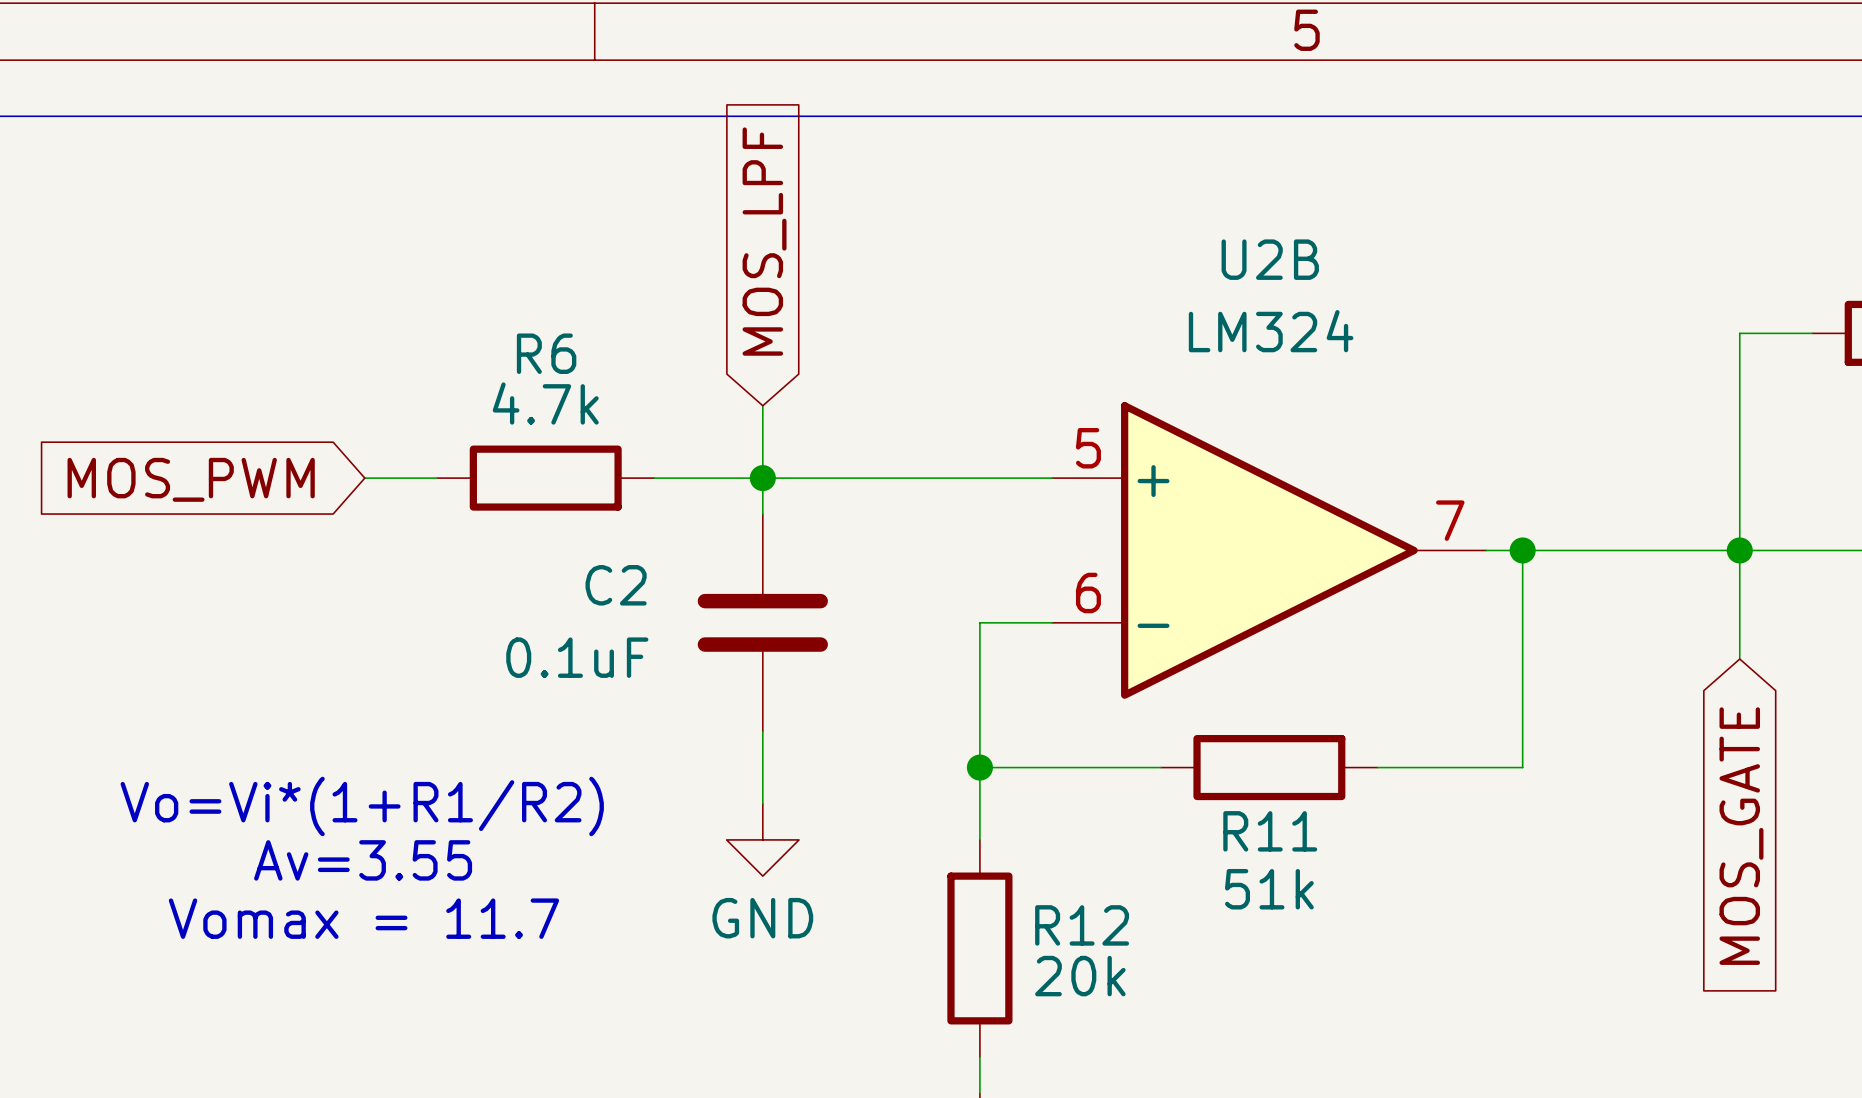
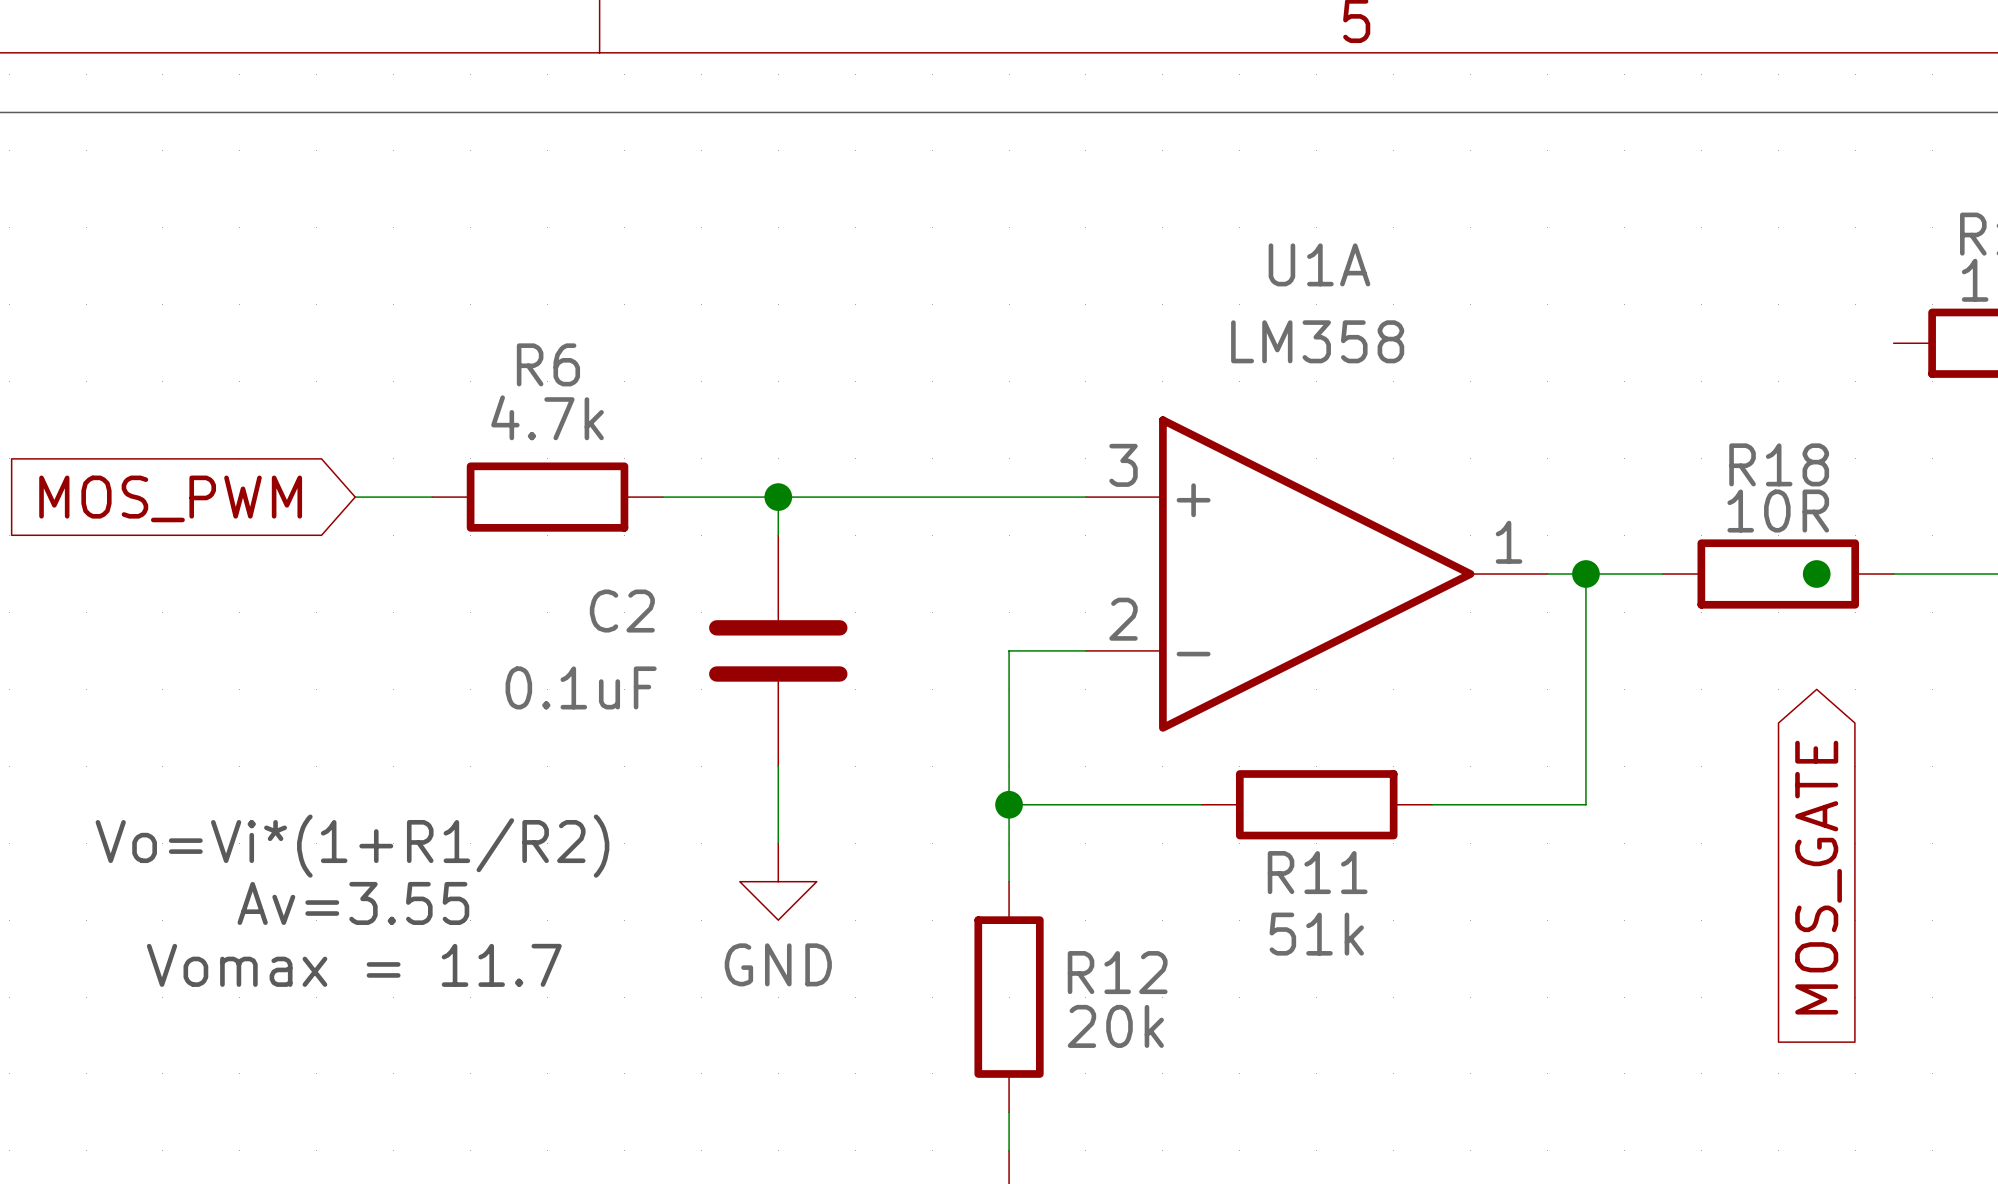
global label: MOS_LPF (764, 241) -> none
U2B name: U2B (1270, 259) -> U1A (1319, 264)
U2B value: LM324 (1271, 331) -> LM358 (1317, 341)
wire: (1812, 333) (1739, 333) (1739, 659) -> none
wire: (762, 405) (762, 478) -> none
U2B pin number: 5 (1088, 448) -> 3 (1123, 465)
U2B pin number: 7 (1450, 520) -> 1 (1509, 542)
wire: (1595, 550) (1812, 550) -> none
R18: none -> 10R (1778, 574)
U2B pin number: 6 (1088, 592) -> 2 (1123, 619)

